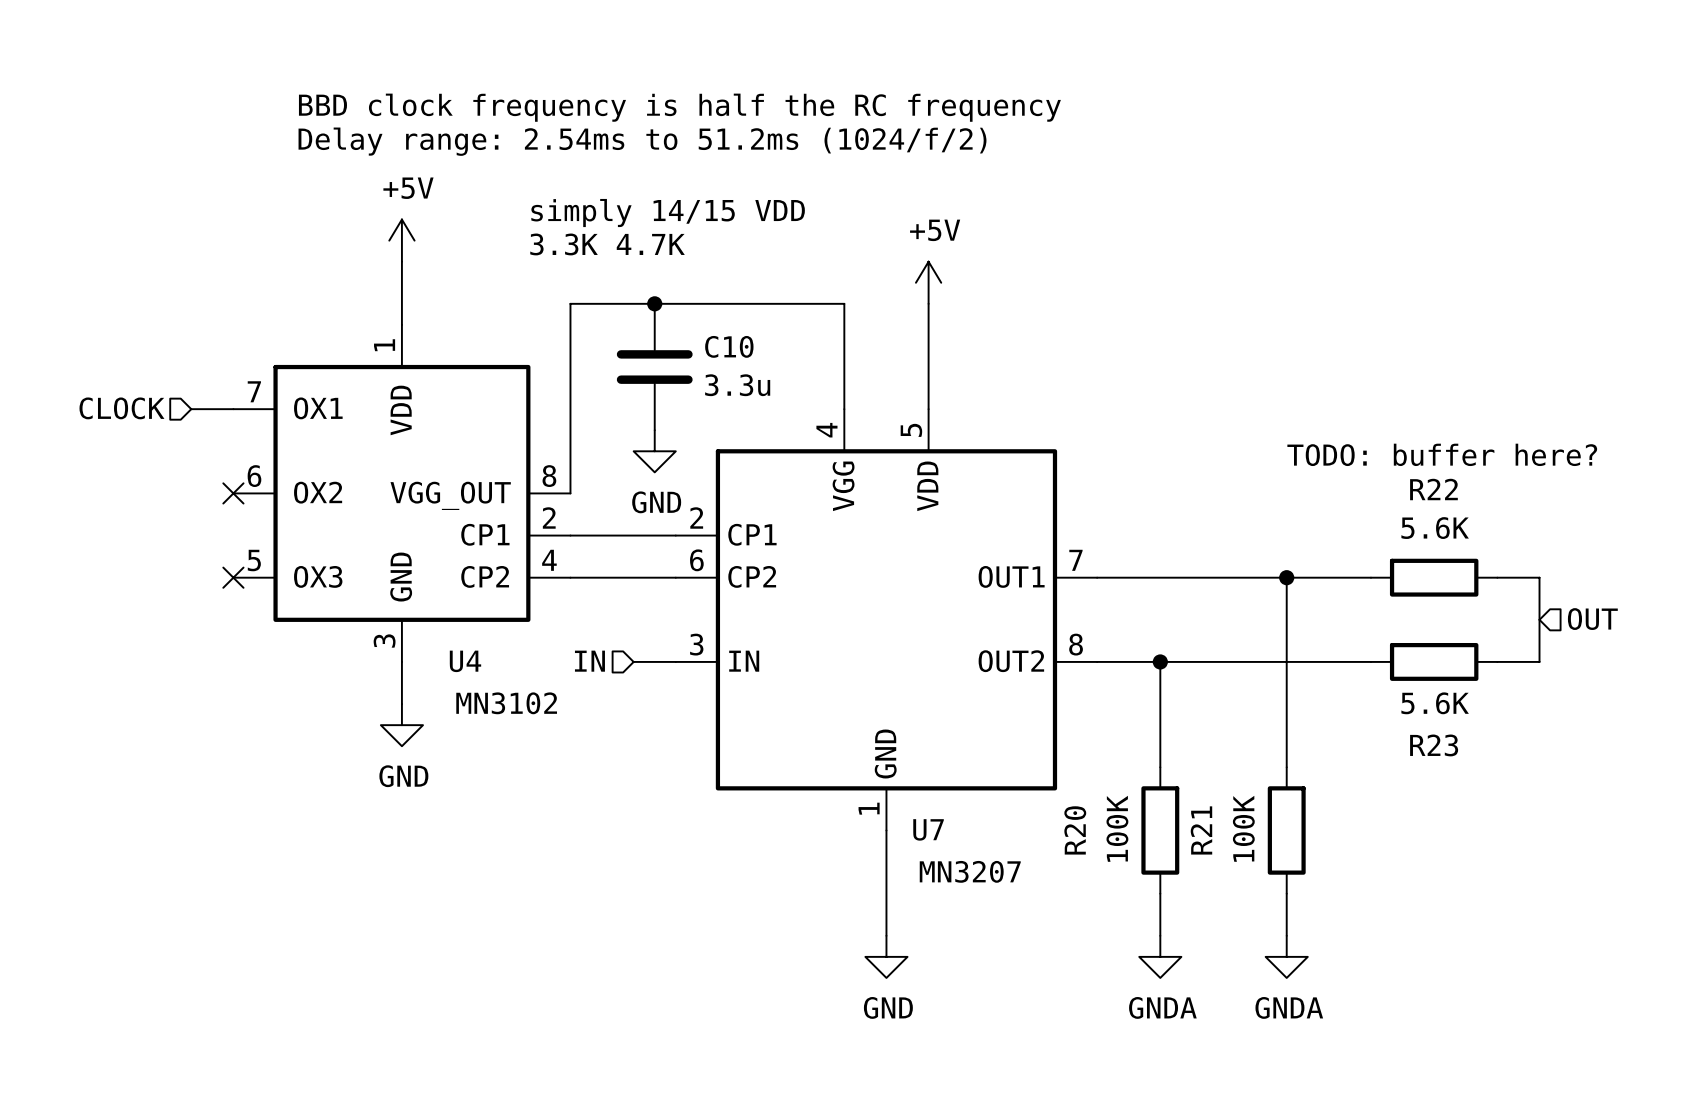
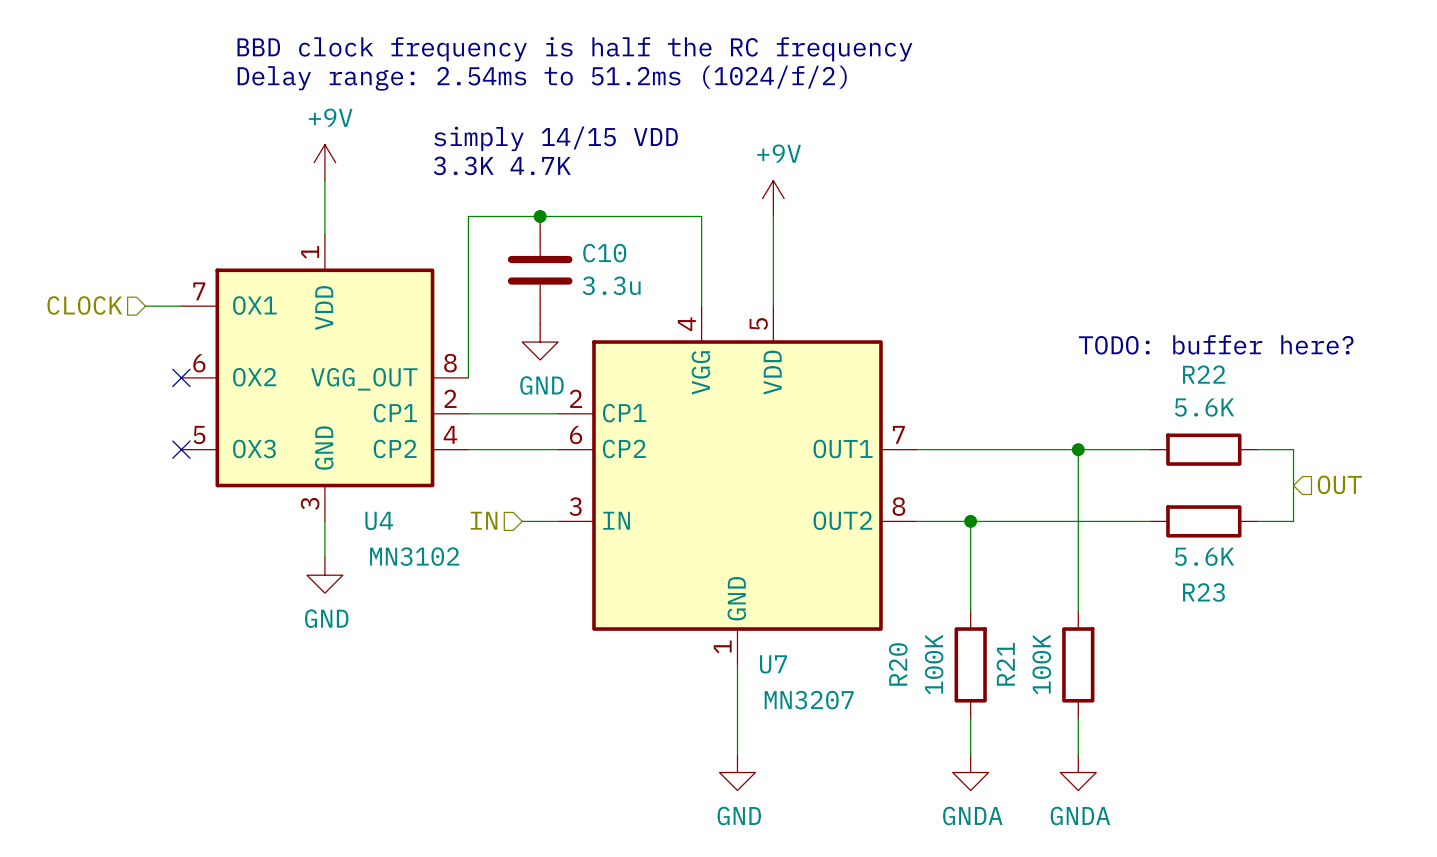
power symbol: +5V (401, 240) -> +9V (324, 162)
power symbol: +5V (928, 282) -> +9V (773, 198)

